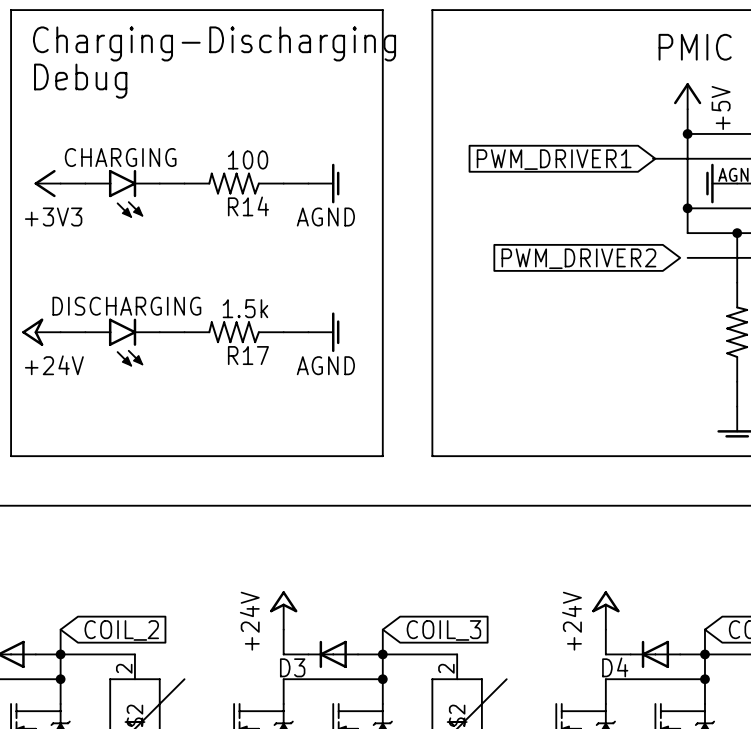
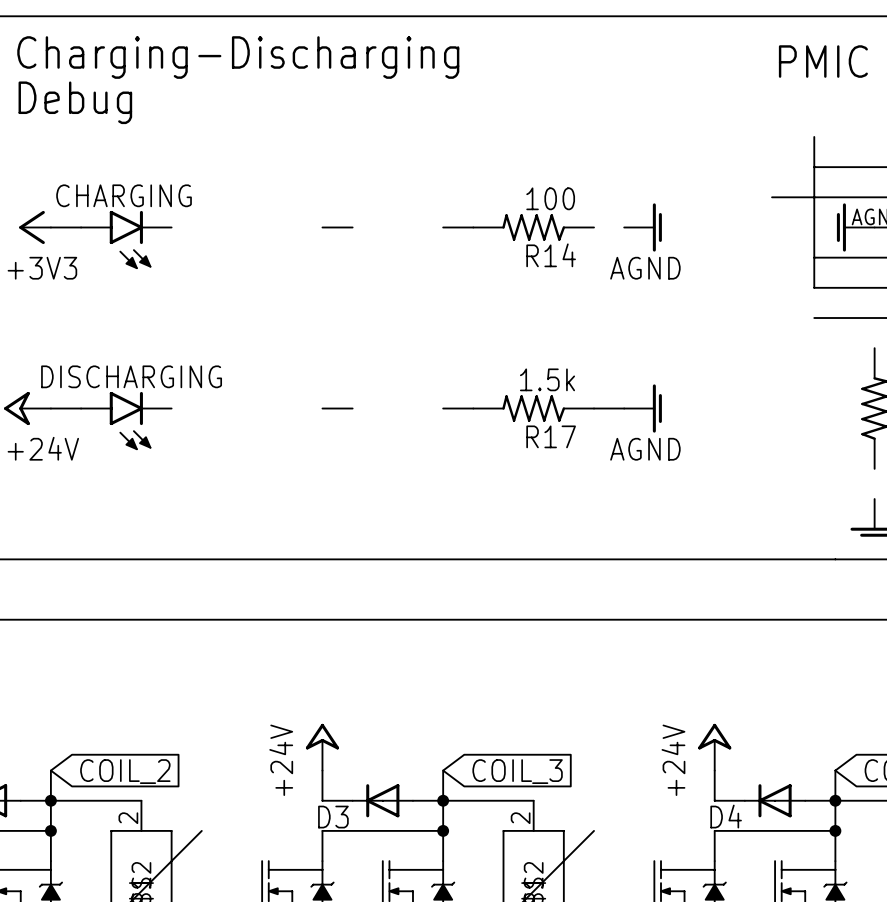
wire: (382, 10) (382, 456) -> (443, 16) (503, 16)
wire: (432, 10) (432, 456) -> (443, 559) (503, 559)
power symbol: +5V (687, 96) -> none
junction: (687, 133) -> none
global label: PWM_DRIVER1 (554, 159) -> none
wire: (159, 183) (184, 183) -> (443, 227) (473, 227)
R14 position: (234, 183) -> (533, 227)
power symbol: AGND (323, 183) -> none
power symbol: none -> AGND (643, 227)
junction: (687, 208) -> none
wire: (737, 233) (737, 282) -> none
junction: (737, 233) -> none
global label: PWM_DRIVER2 (578, 258) -> none
wire: (159, 332) (184, 332) -> (443, 408) (473, 408)
R17 position: (234, 332) -> (533, 408)
power symbol: AGND (323, 332) -> none
wire: none -> (594, 408) (624, 408)
power symbol: none -> AGND (643, 408)
wire: (737, 381) (737, 406) -> none

